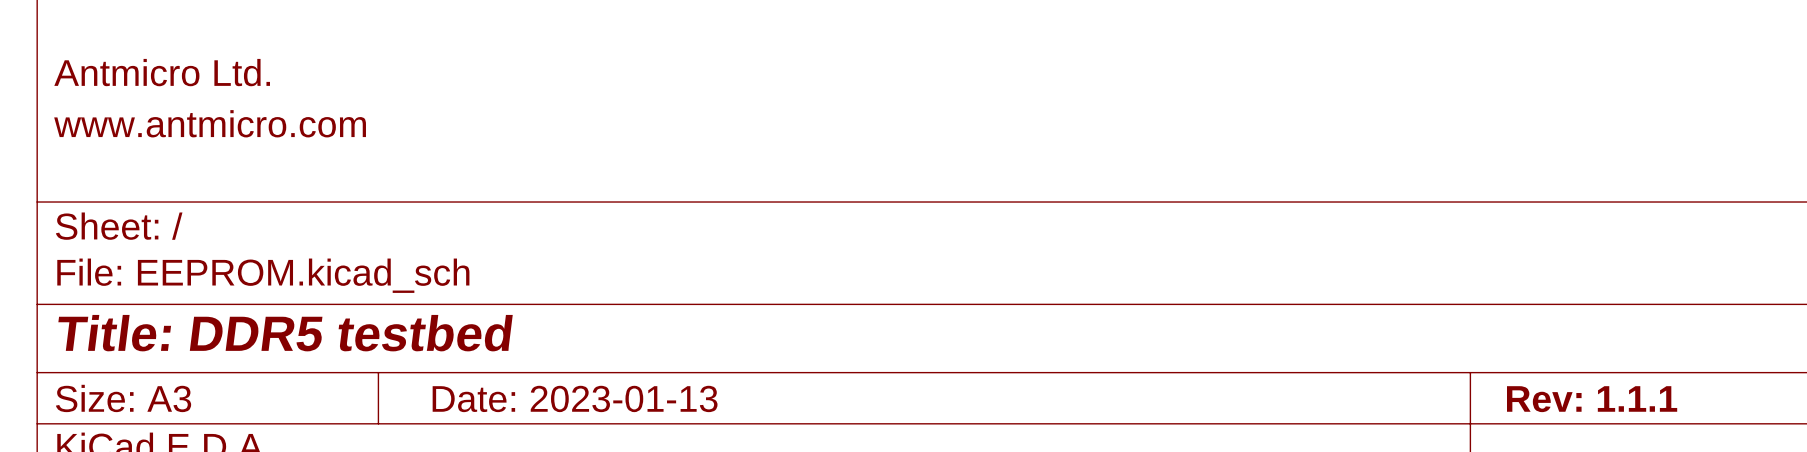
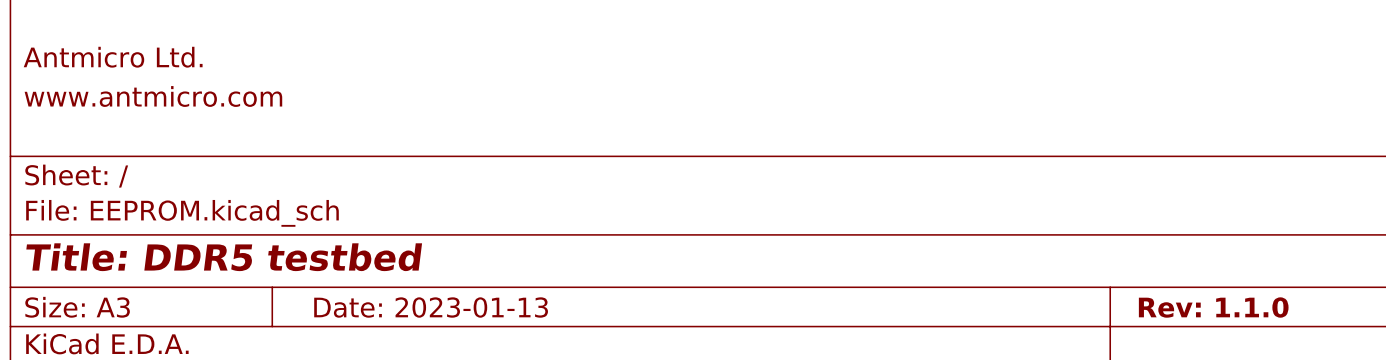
title block: Rev: 1.1.1 (1592, 399) -> Rev: 1.1.0 (1213, 307)

